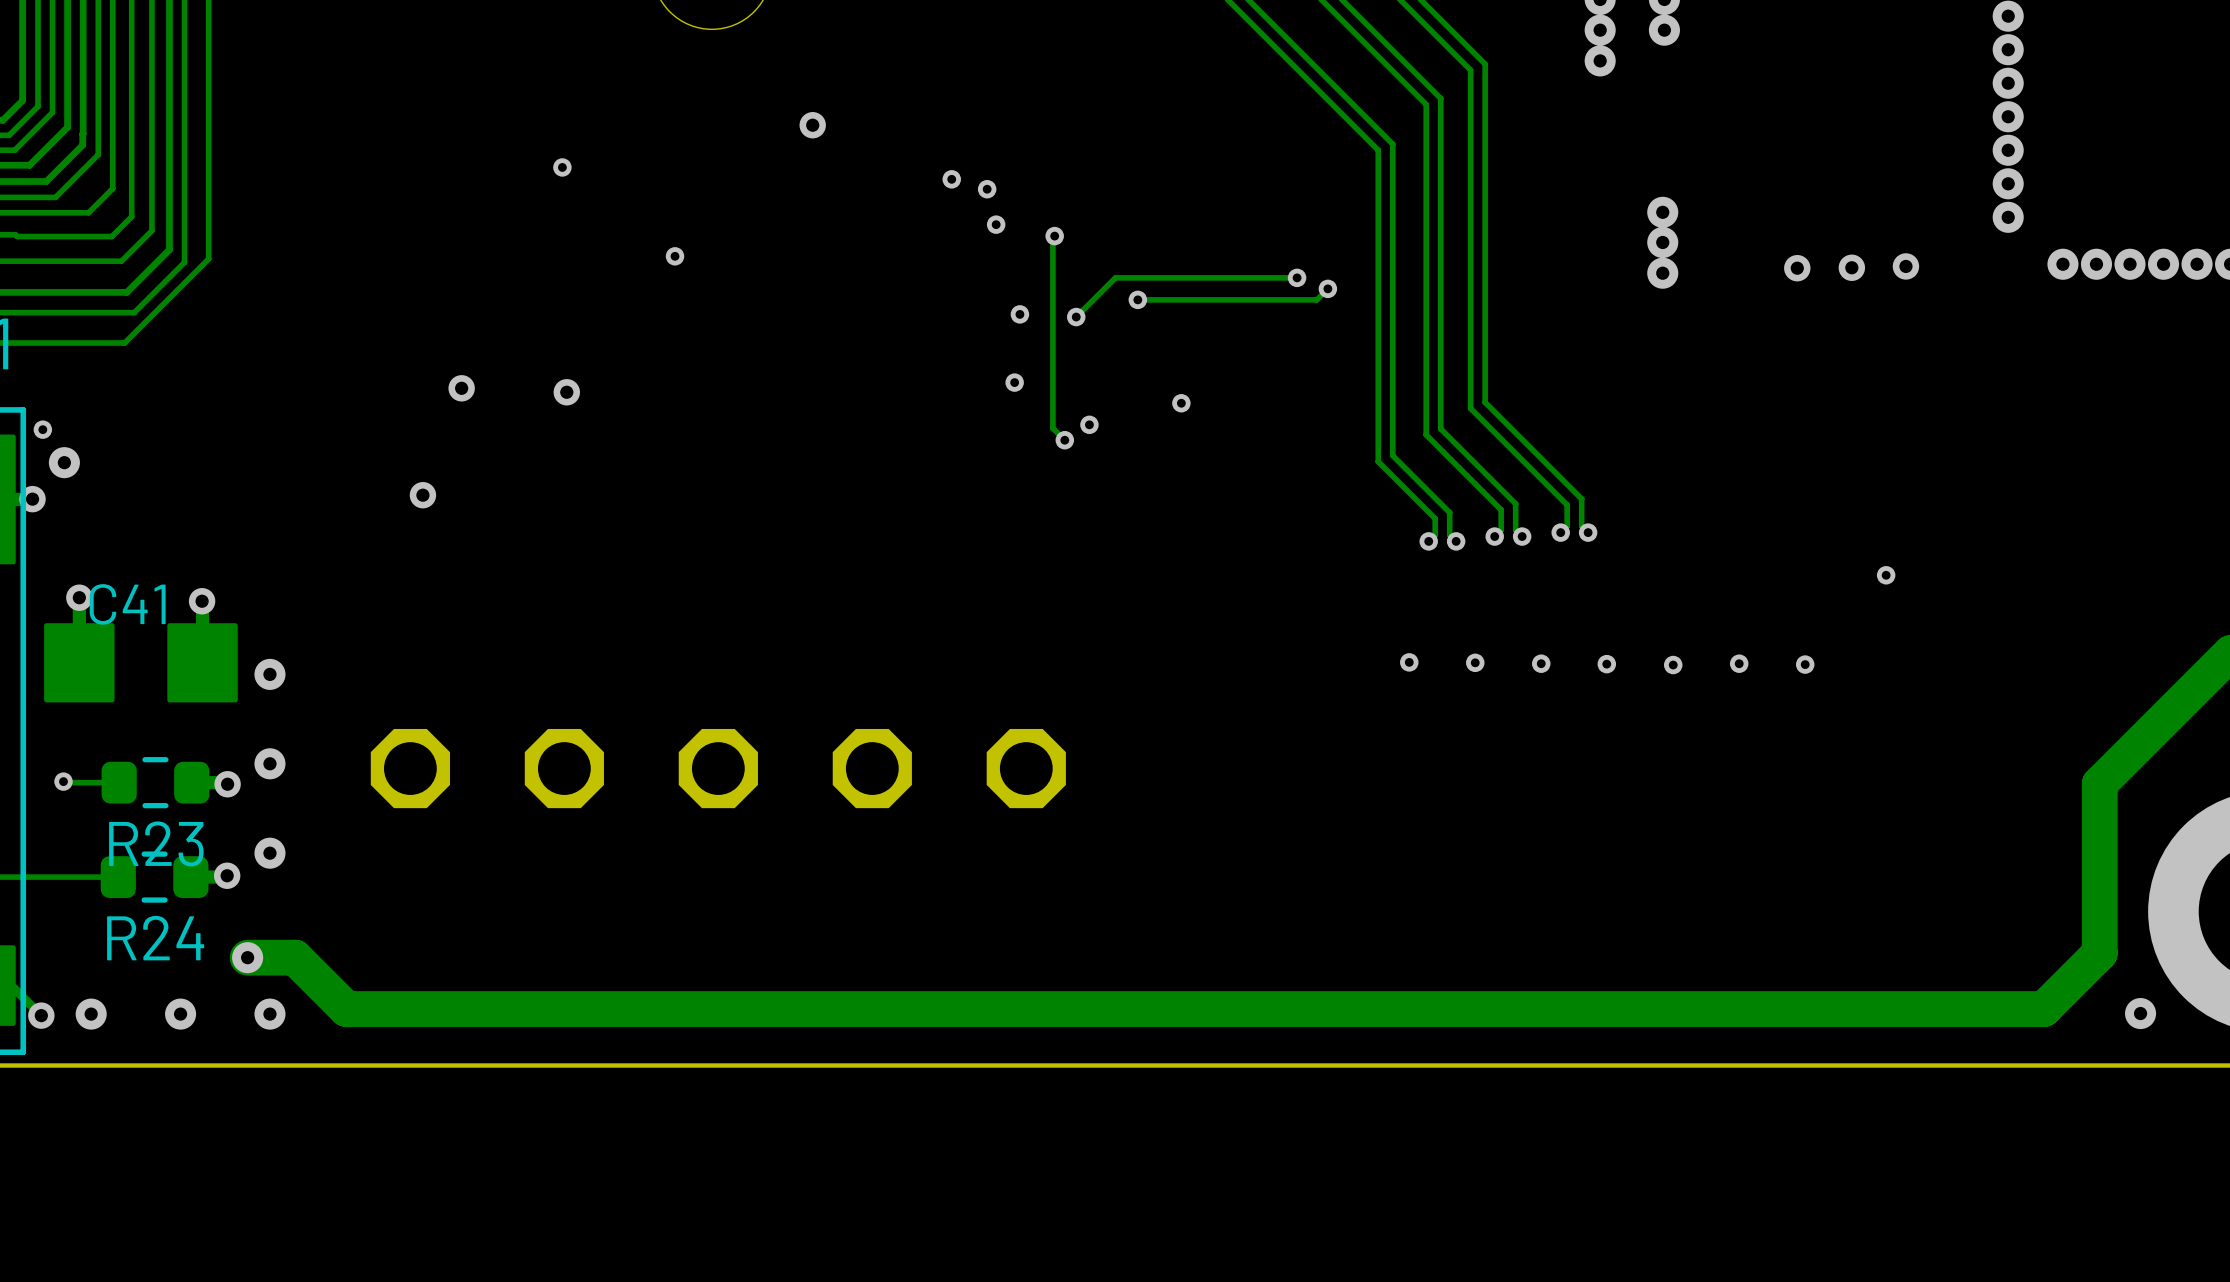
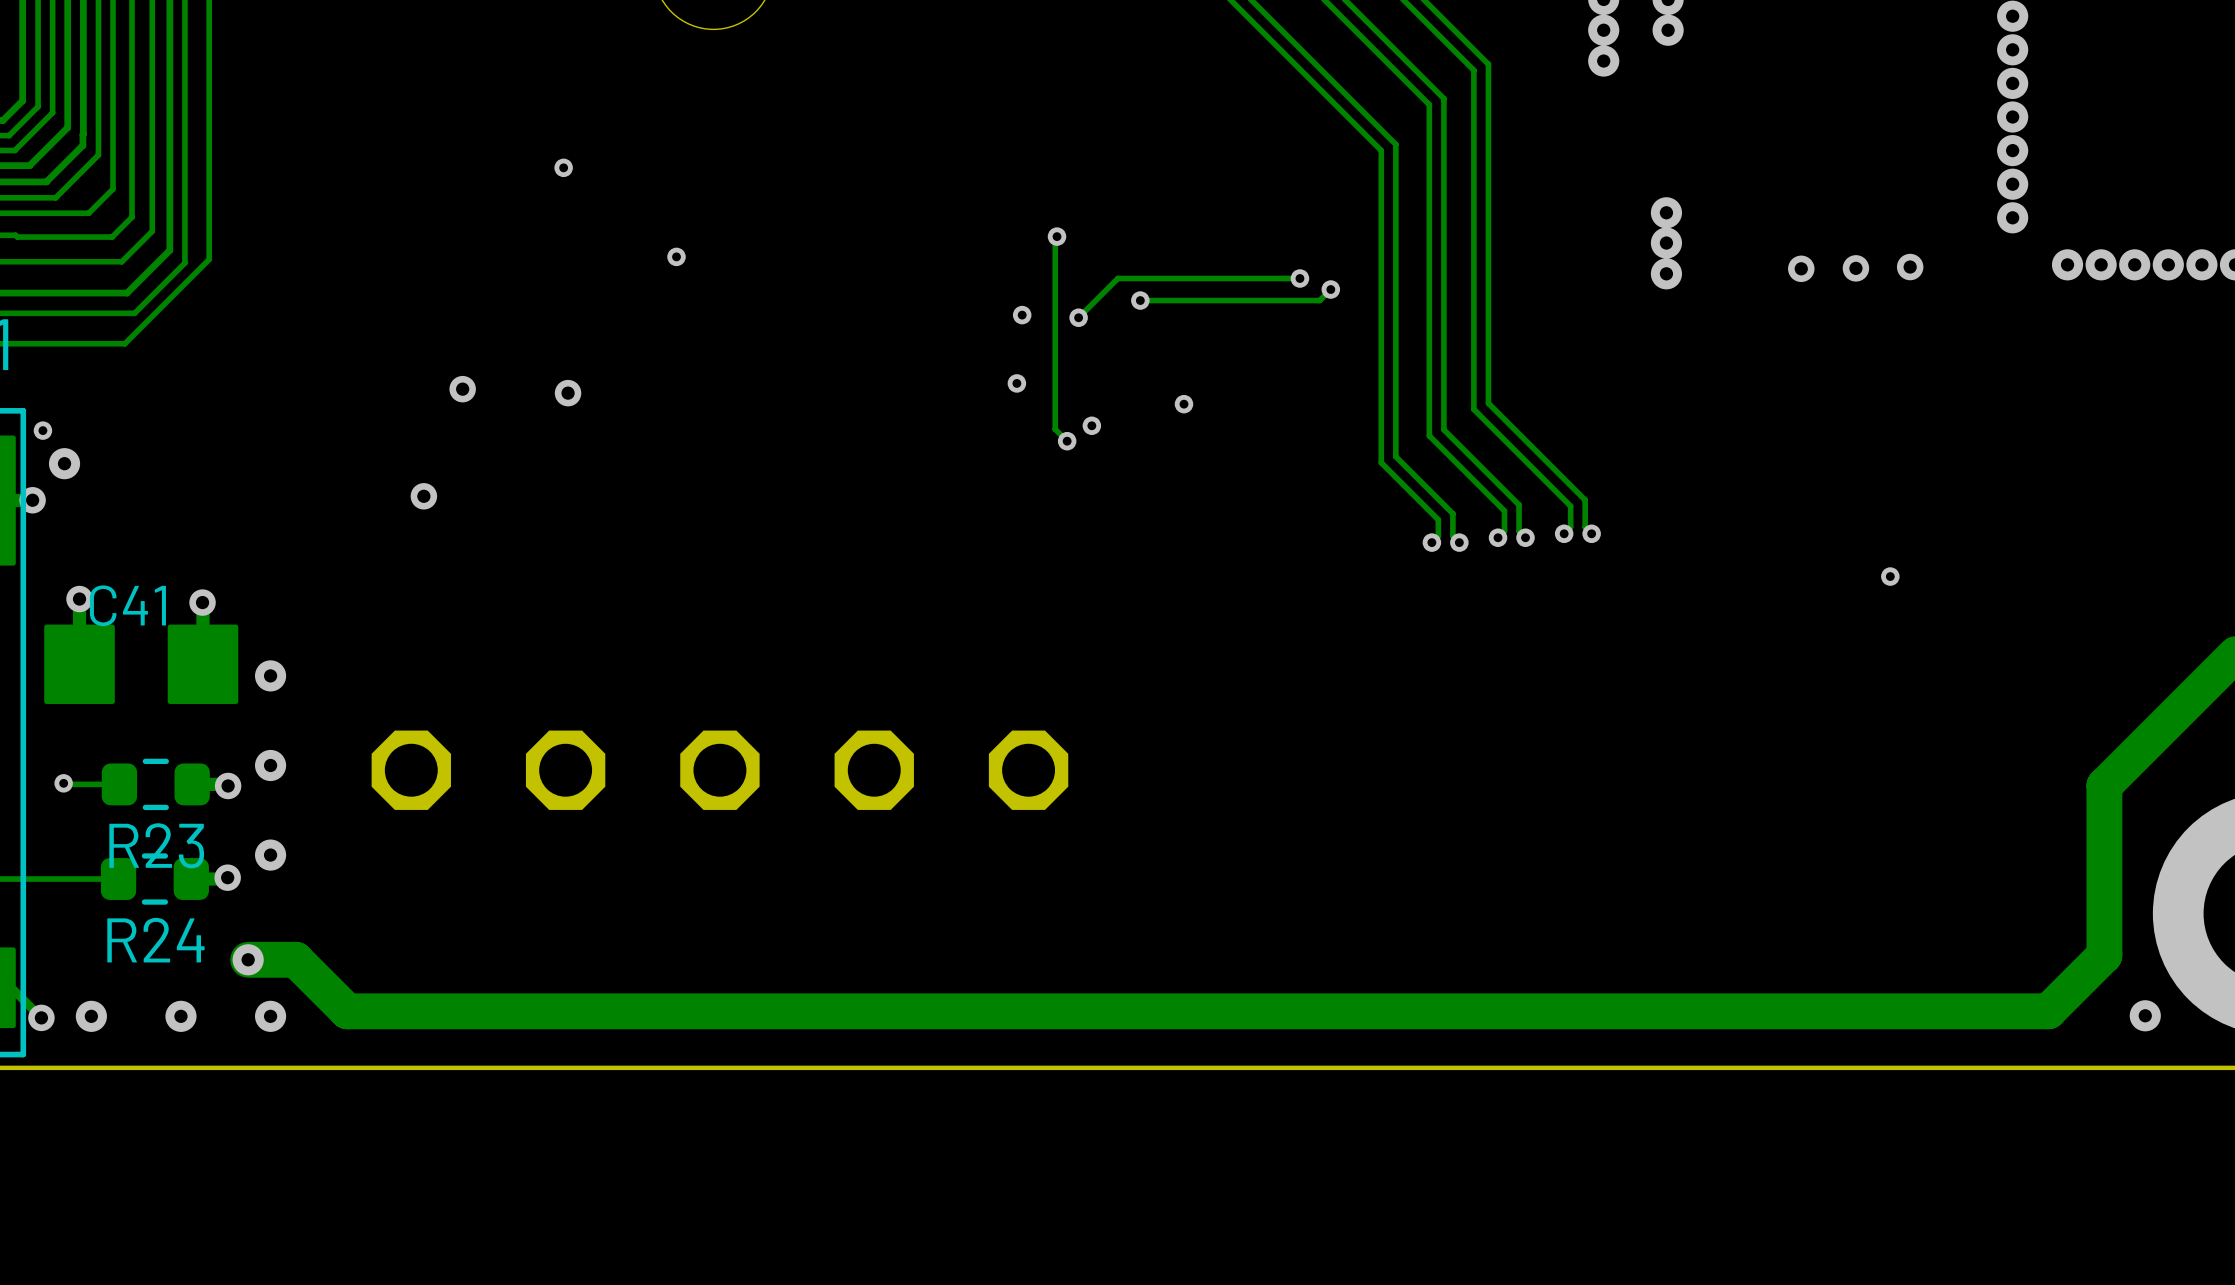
via: (812, 125) -> none
via: (951, 179) -> none
via: (987, 189) -> none
via: (996, 224) -> none
via: (1409, 662) -> none
via: (1475, 662) -> none
via: (1541, 663) -> none
via: (1739, 663) -> none
via: (1606, 664) -> none
via: (1805, 664) -> none
via: (1673, 665) -> none

